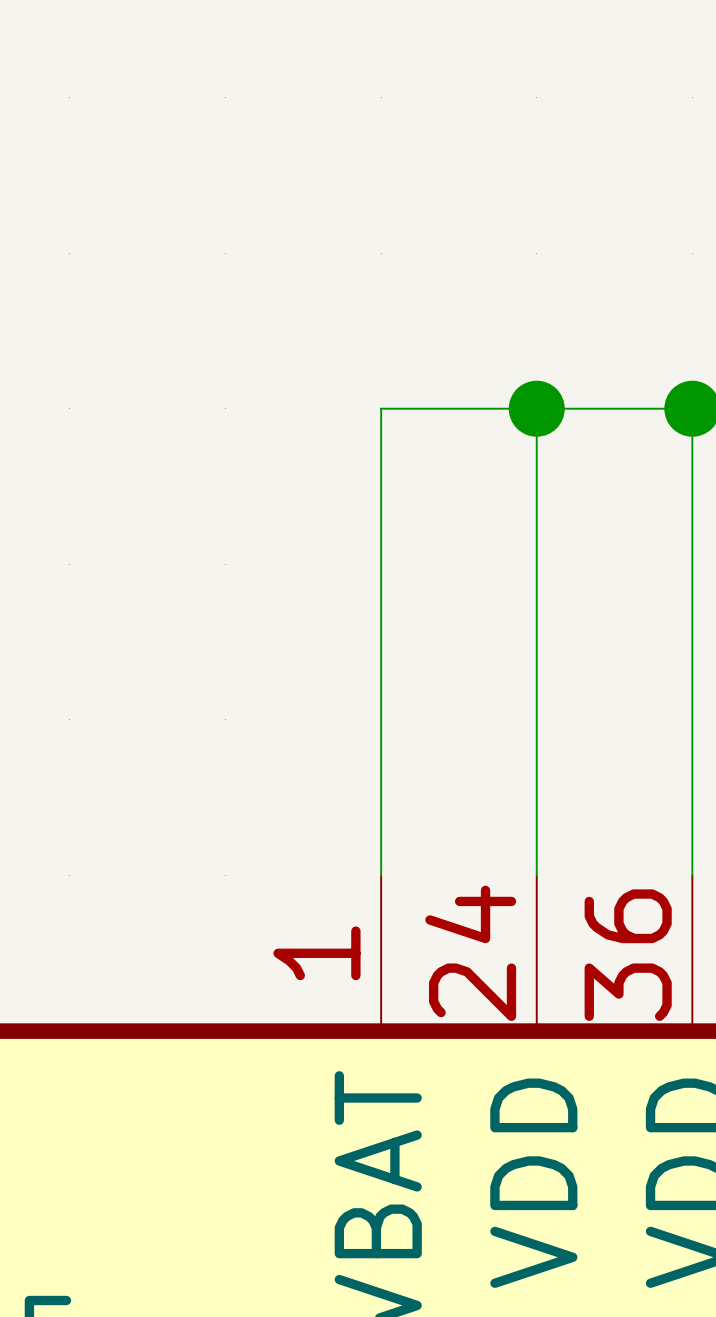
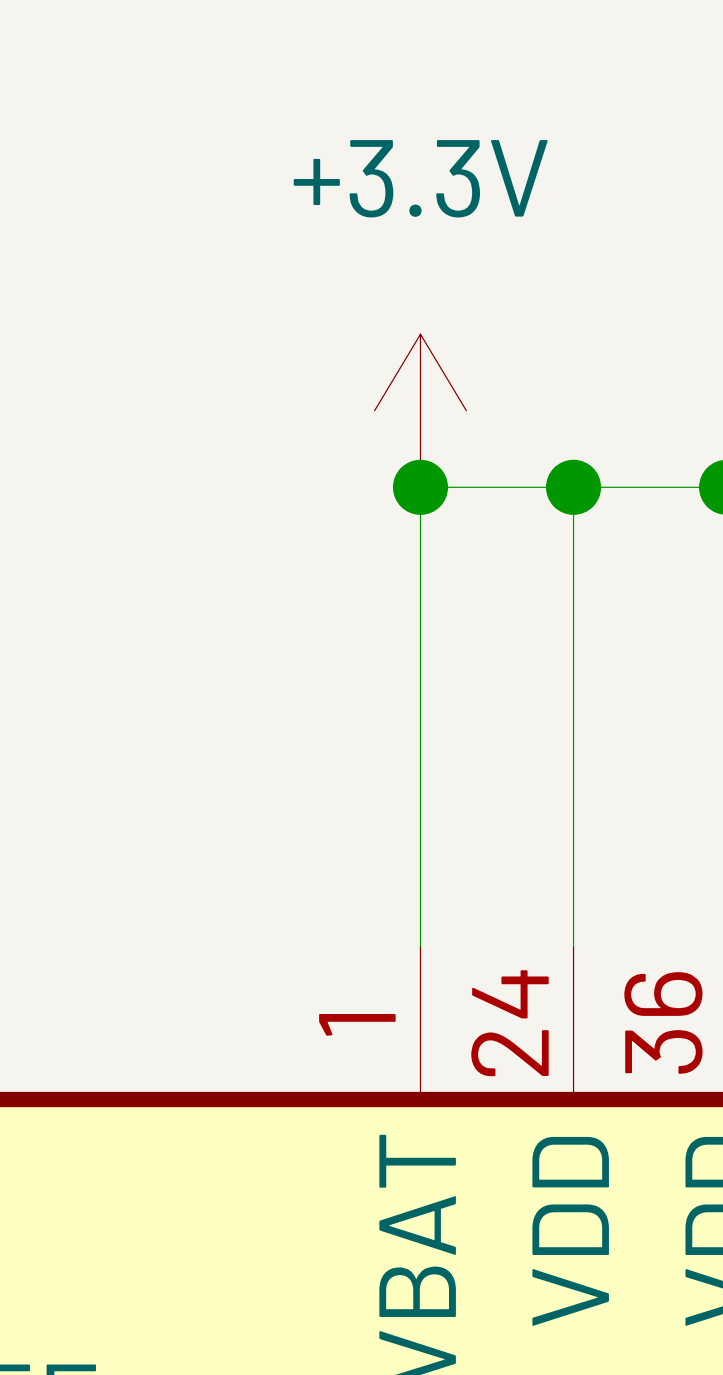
power symbol: none -> +3.3V (420, 410)
junction: none -> (420, 487)

